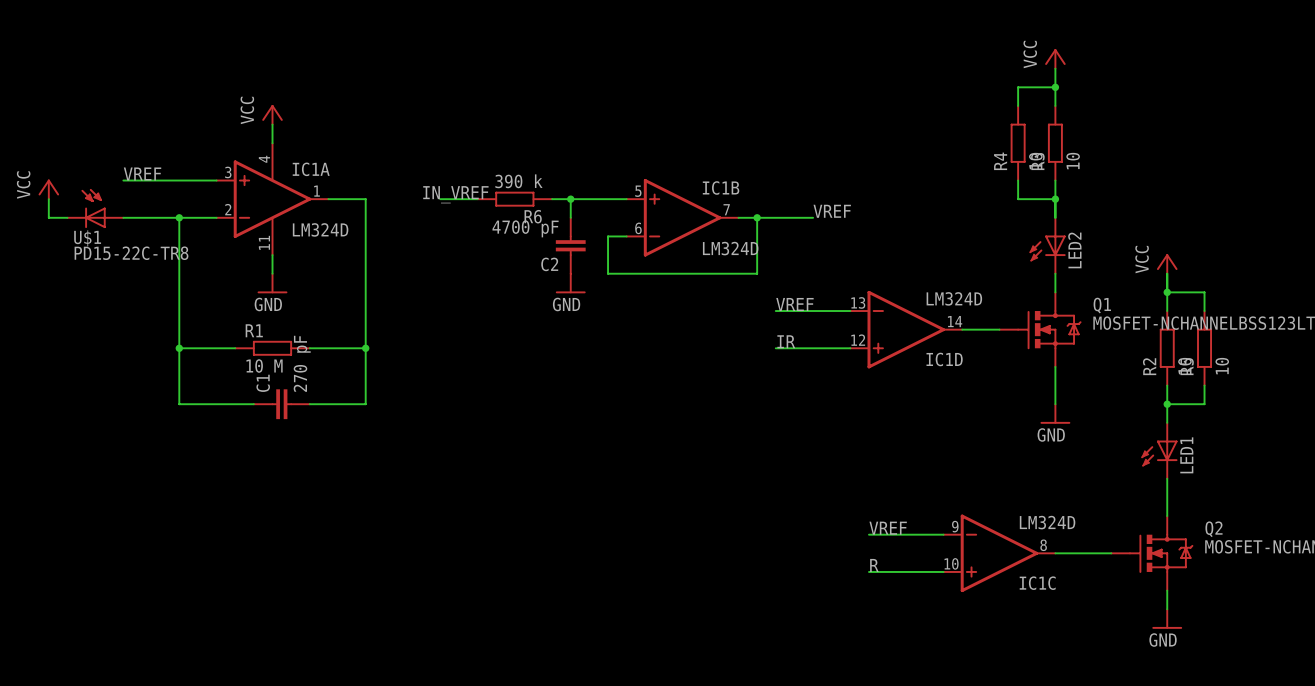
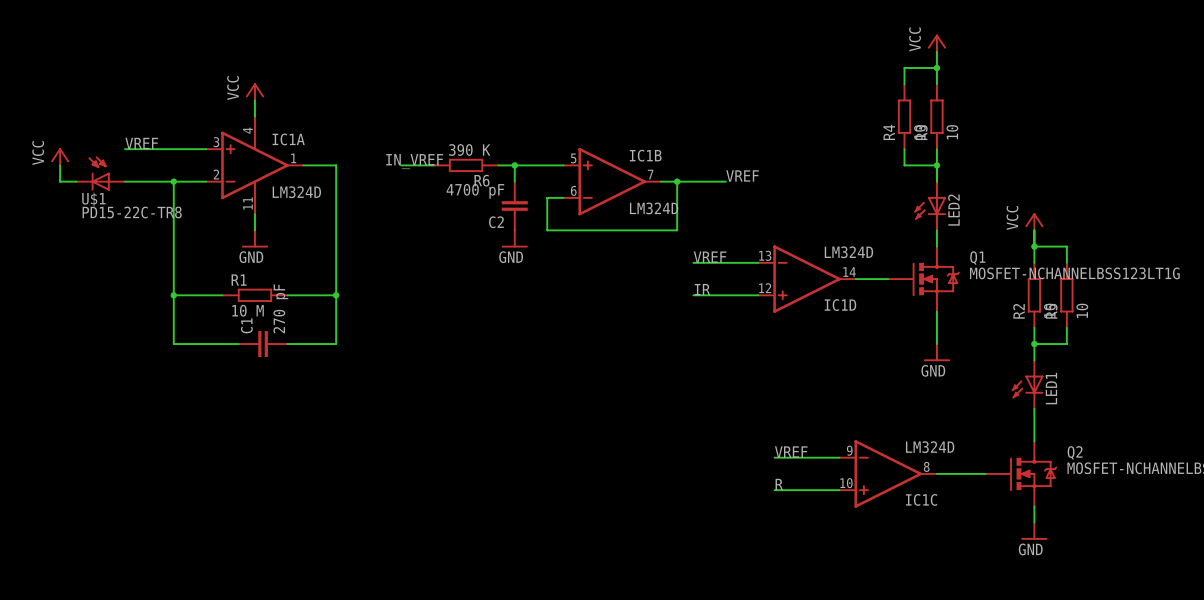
R6 value: 390 k (518, 181) -> 390 K (469, 149)

